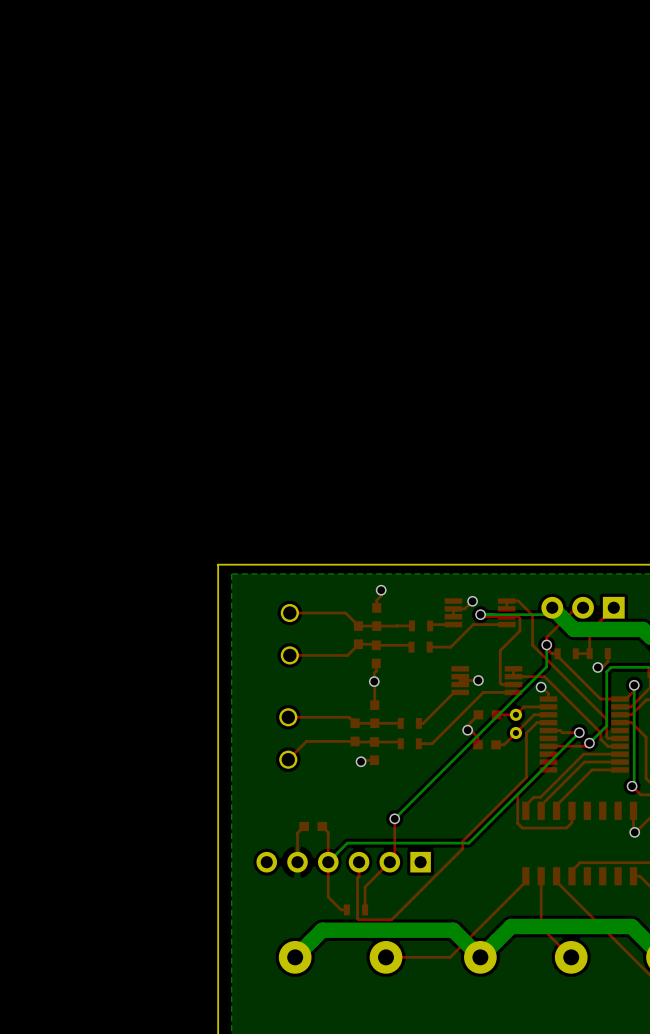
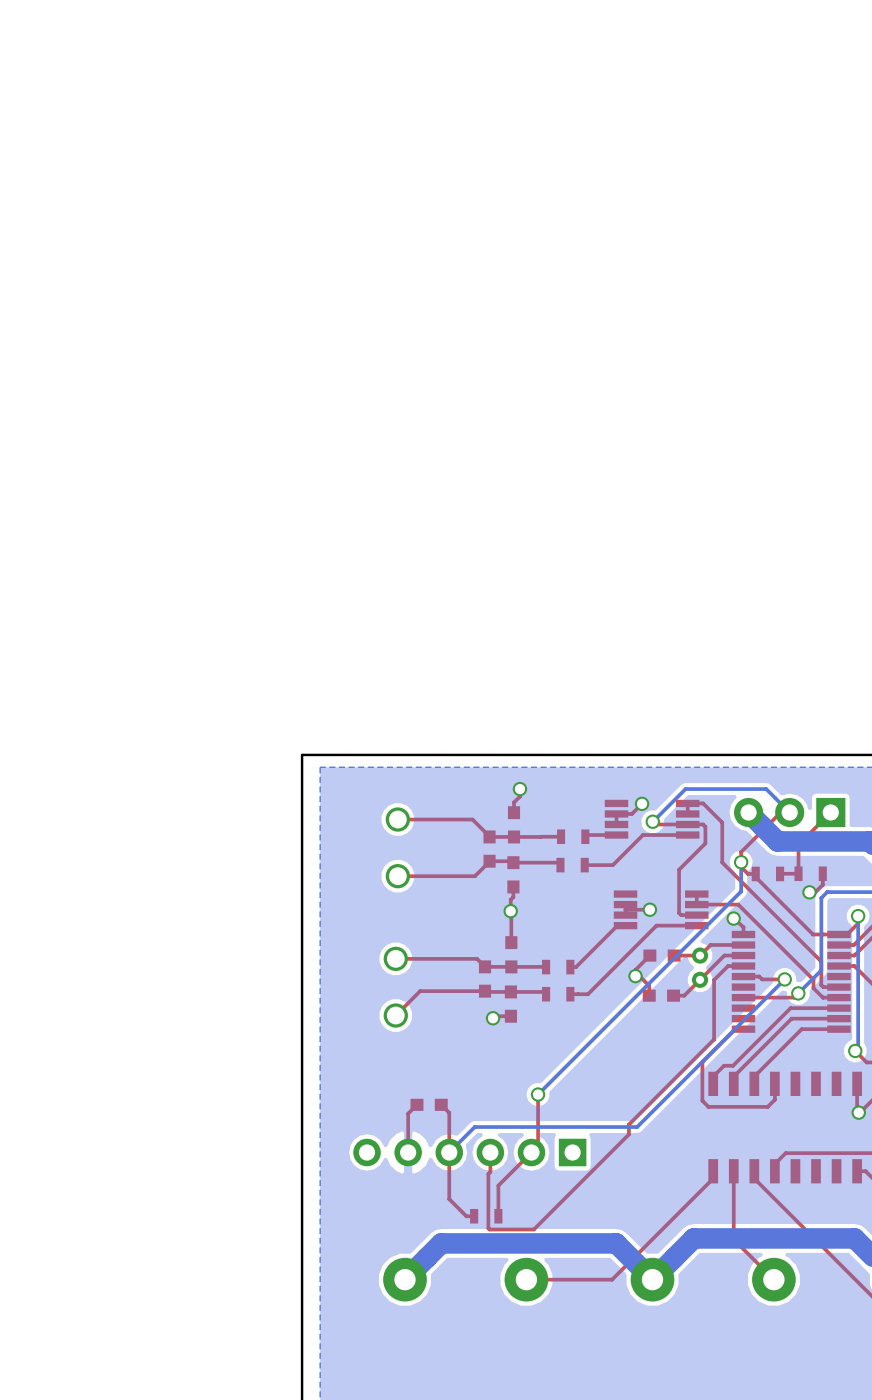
bottom track: (545, 614) (480, 614) -> (789, 812) (766, 789) (685, 789) (652, 821)

